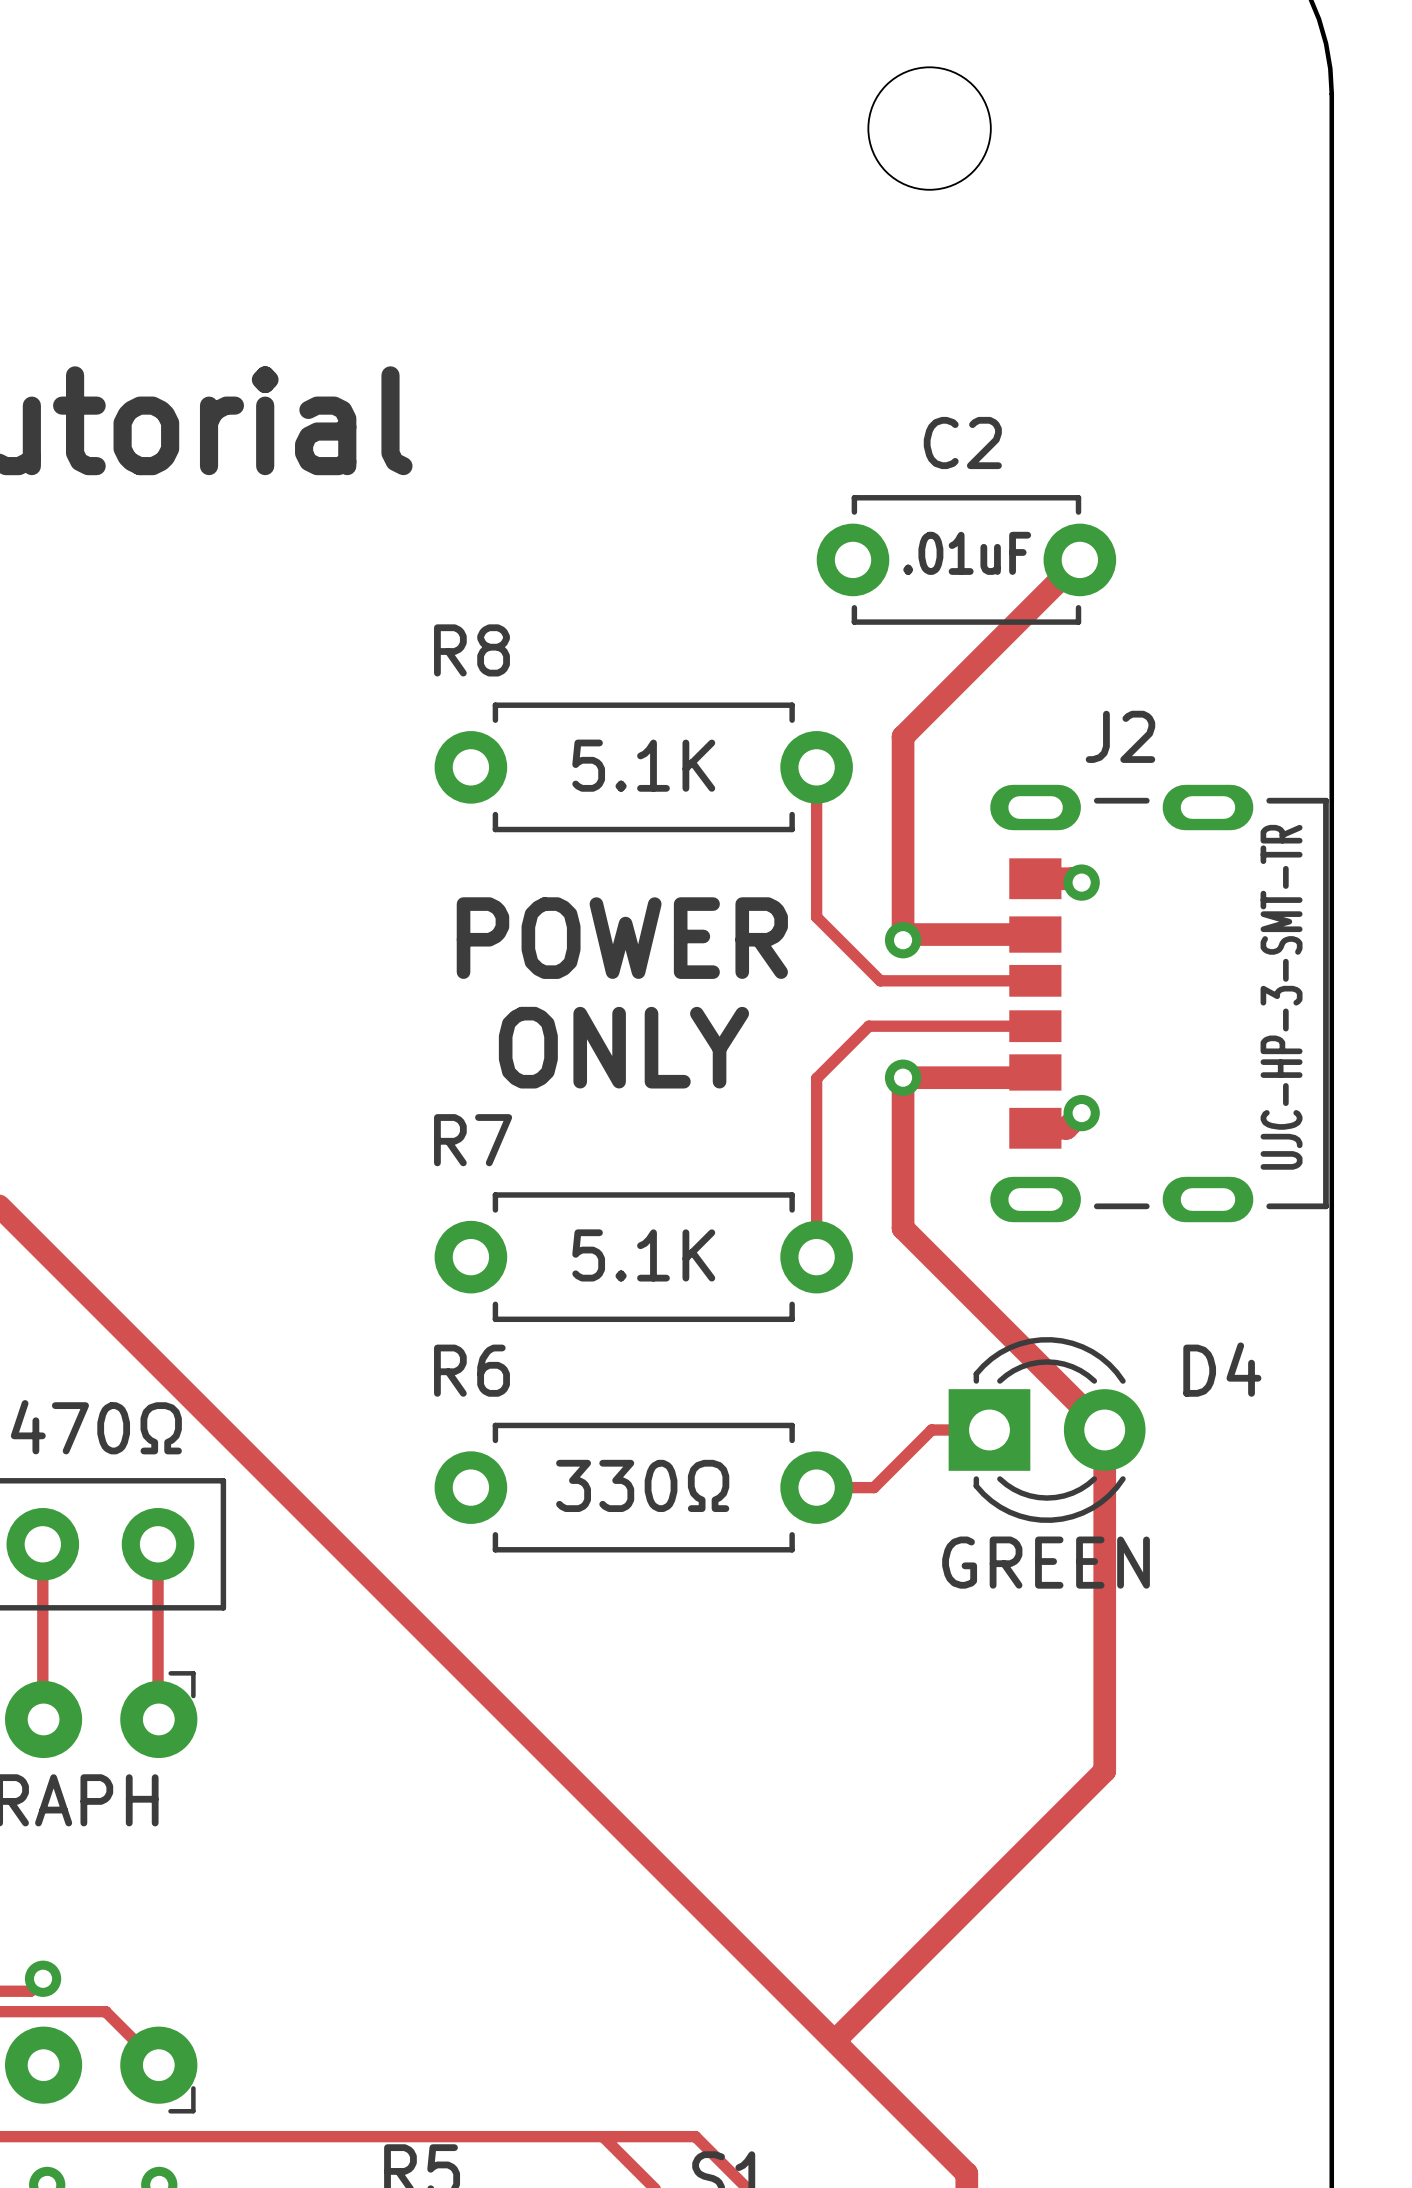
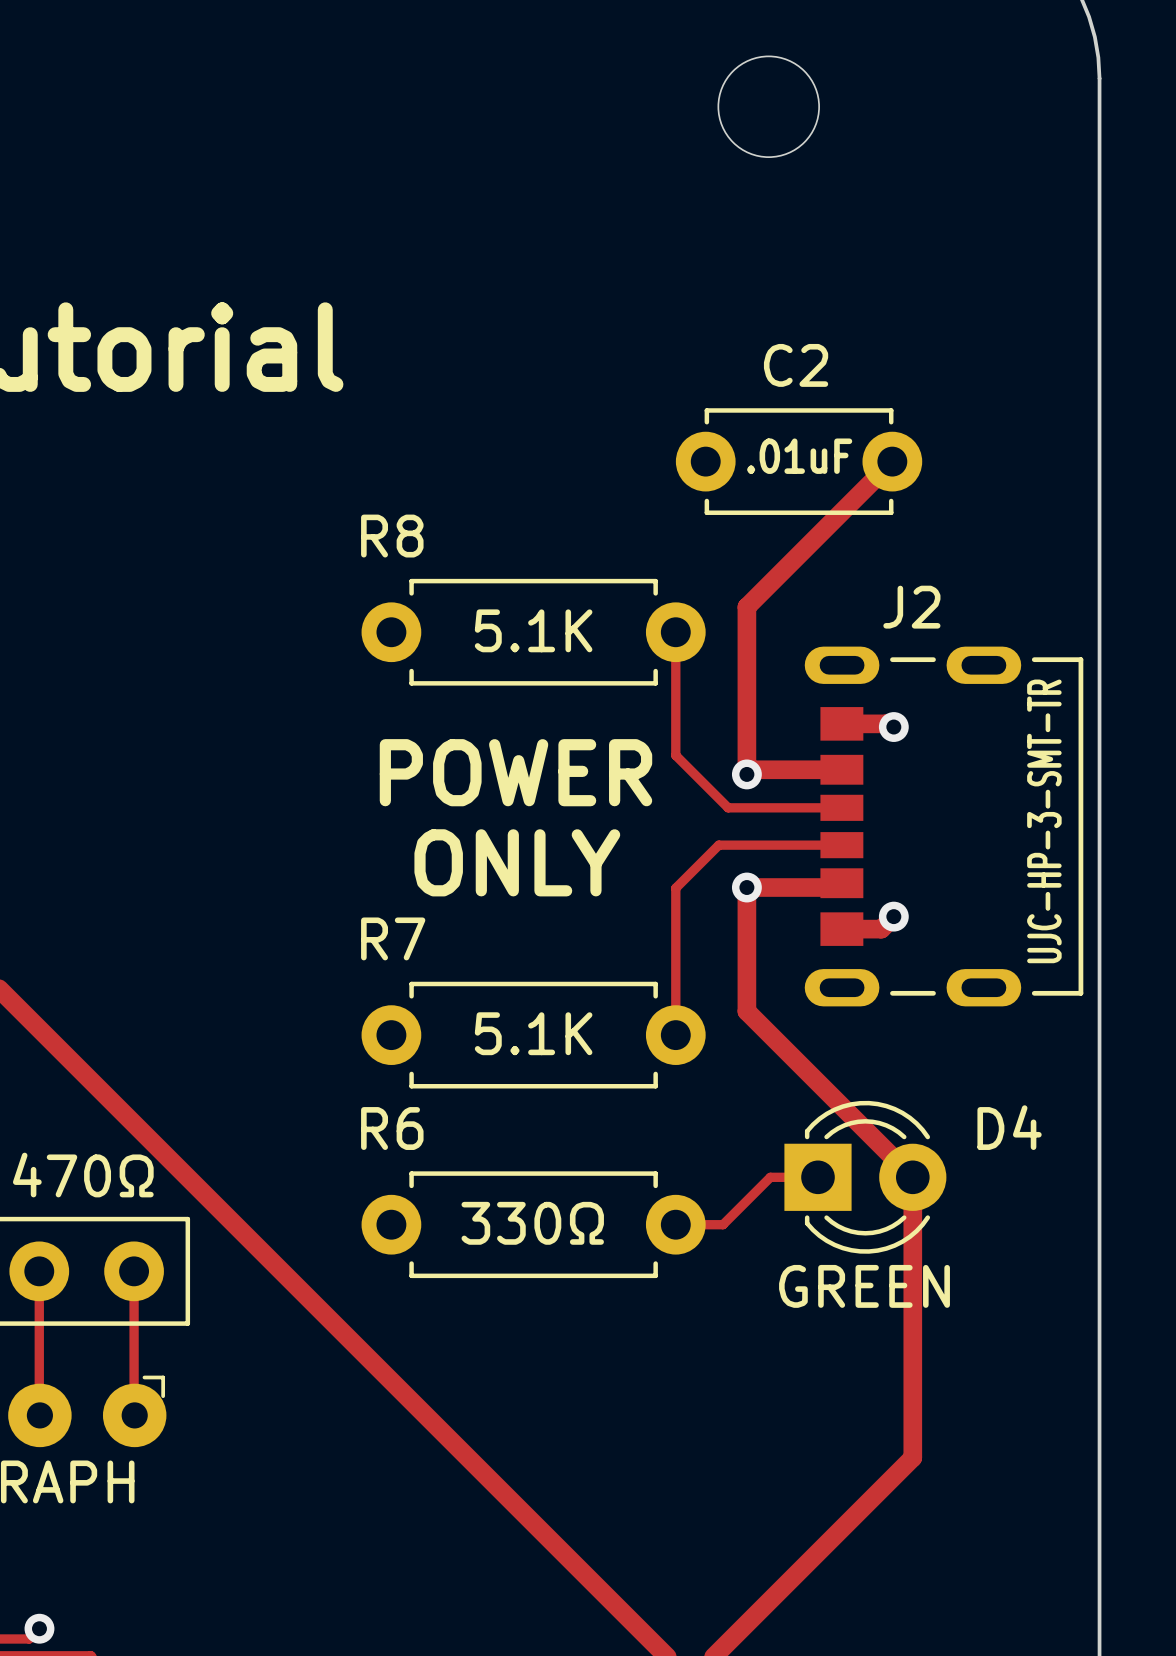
J2 position: (1159, 1003) -> (944, 826)

